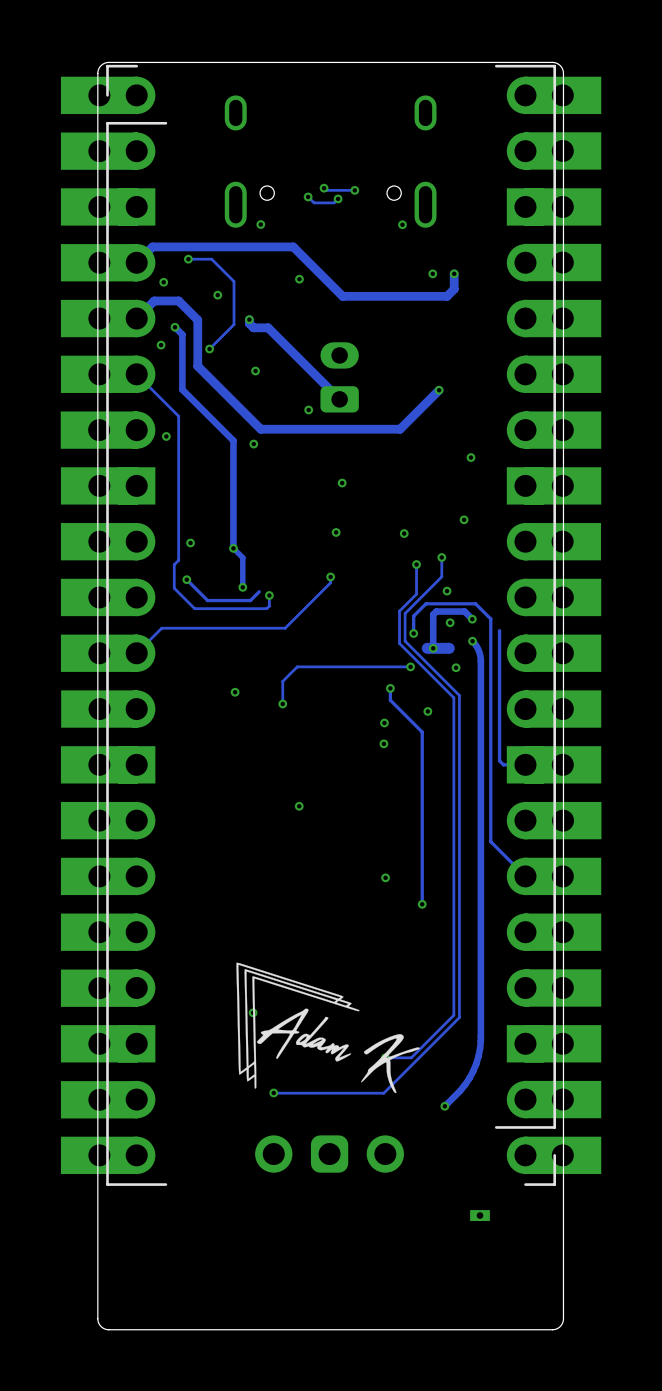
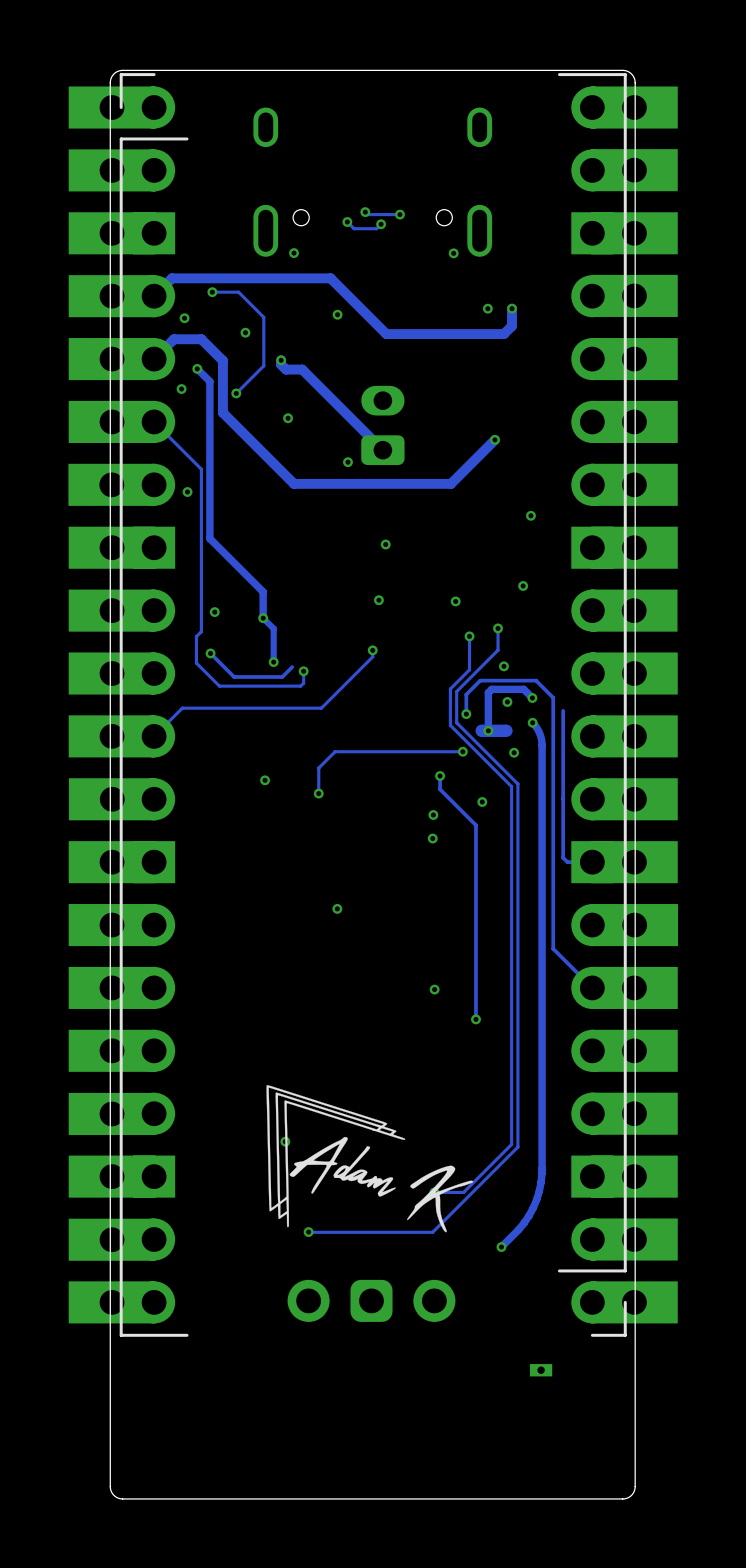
track: (182, 334) (182, 389) (233, 440) (233, 525) -> (205, 377) (209, 381) (209, 538) (263, 591)
via: (253, 444) -> none

